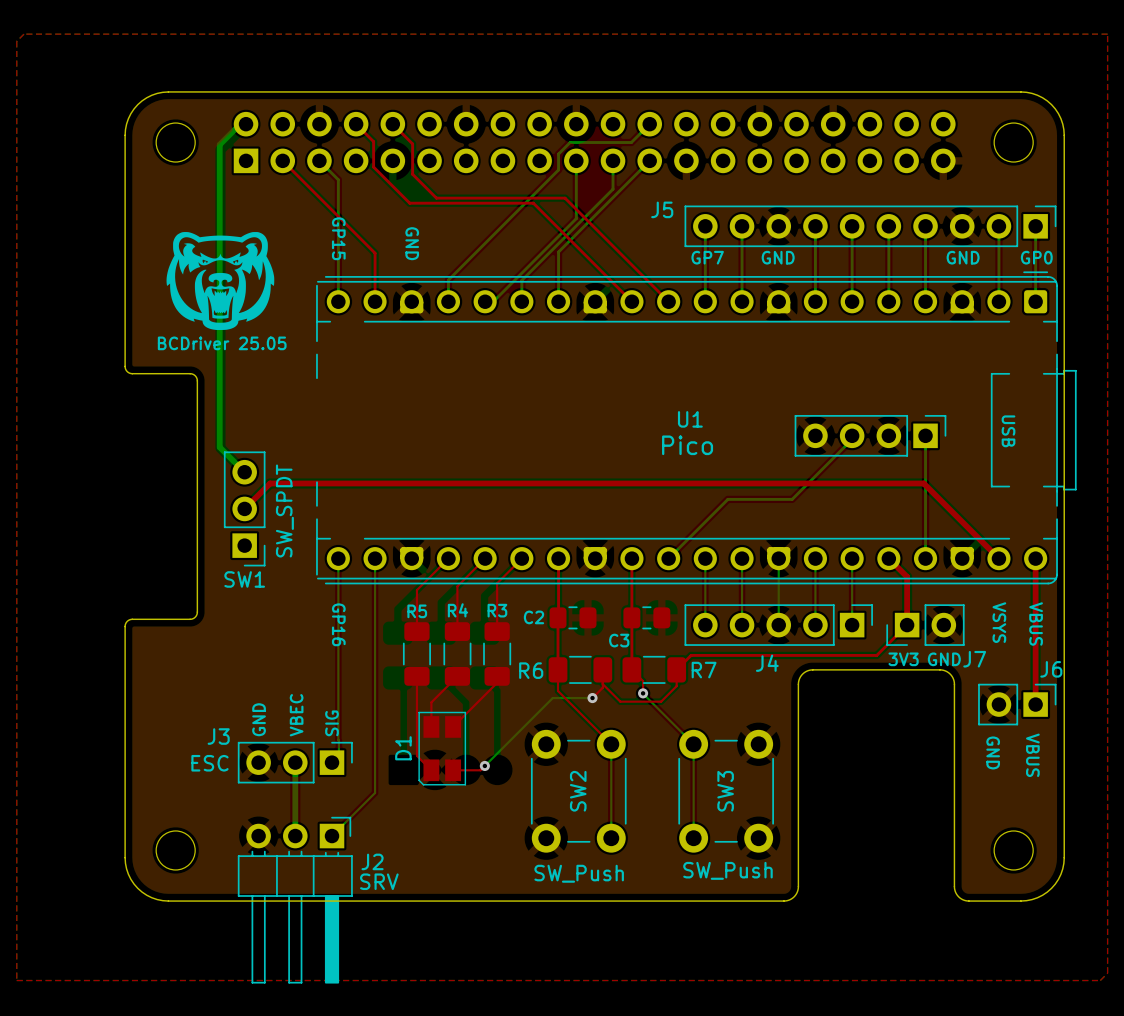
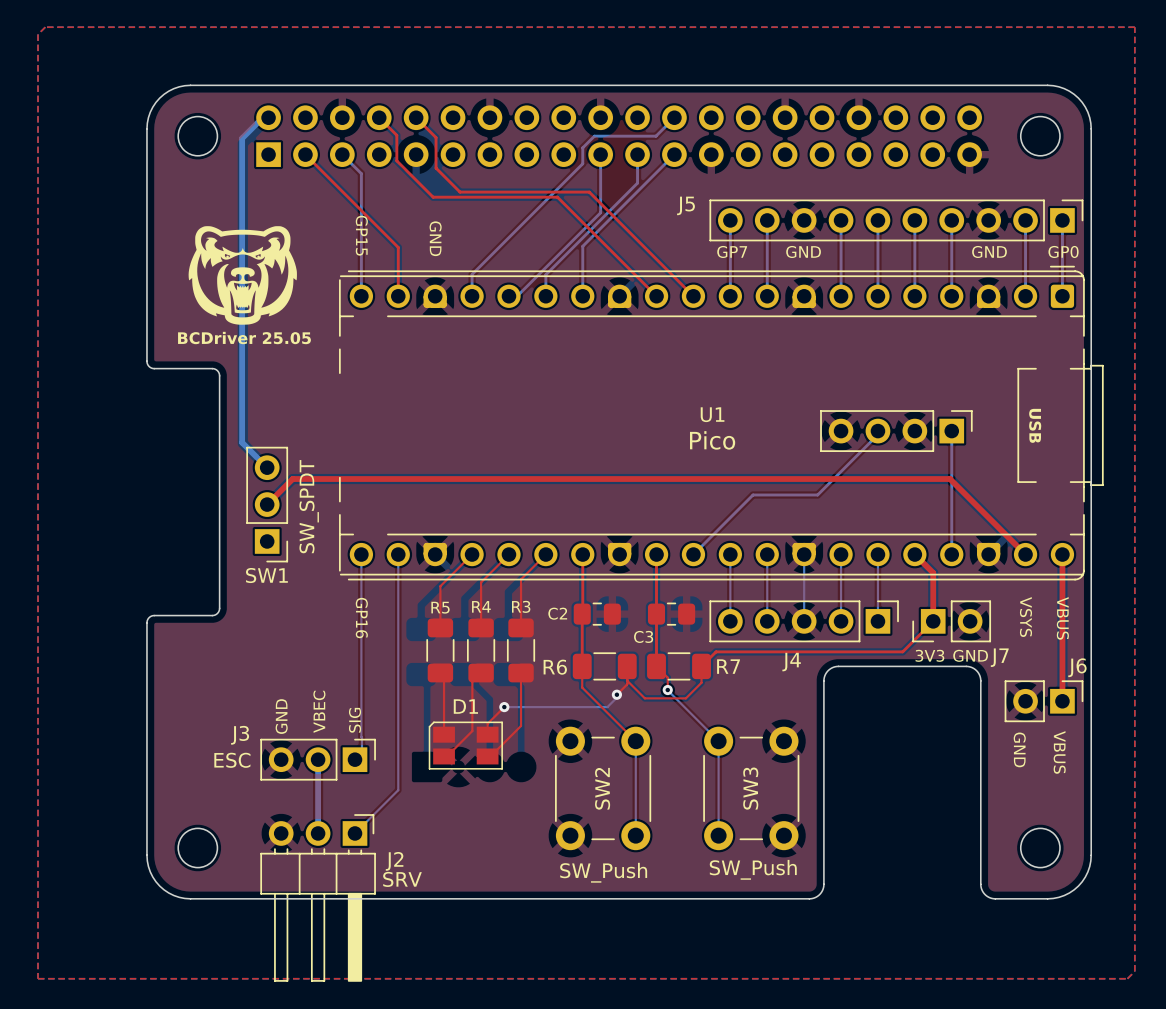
top track: (416, 676) (416, 755) (431, 770) -> (440, 672) (444, 676) (444, 734)
top track: (497, 682) (453, 726) -> (521, 679) (521, 725) (490, 756) (487, 756)
top track: (448, 685) (431, 702) (431, 726) -> (472, 681) (472, 731) (446, 756) (444, 756)
bottom track: none -> (620, 694) (607, 707) (504, 707)
bottom track: (592, 698) (552, 698) (484, 765) -> none
top track: none -> (504, 707) (487, 723) (487, 734)
D1 rotation: 0° (442, 748) -> 90° clockwise (465, 745)
top track: (484, 765) (480, 770) (453, 770) -> none
via position: (484, 765) -> (504, 707)

